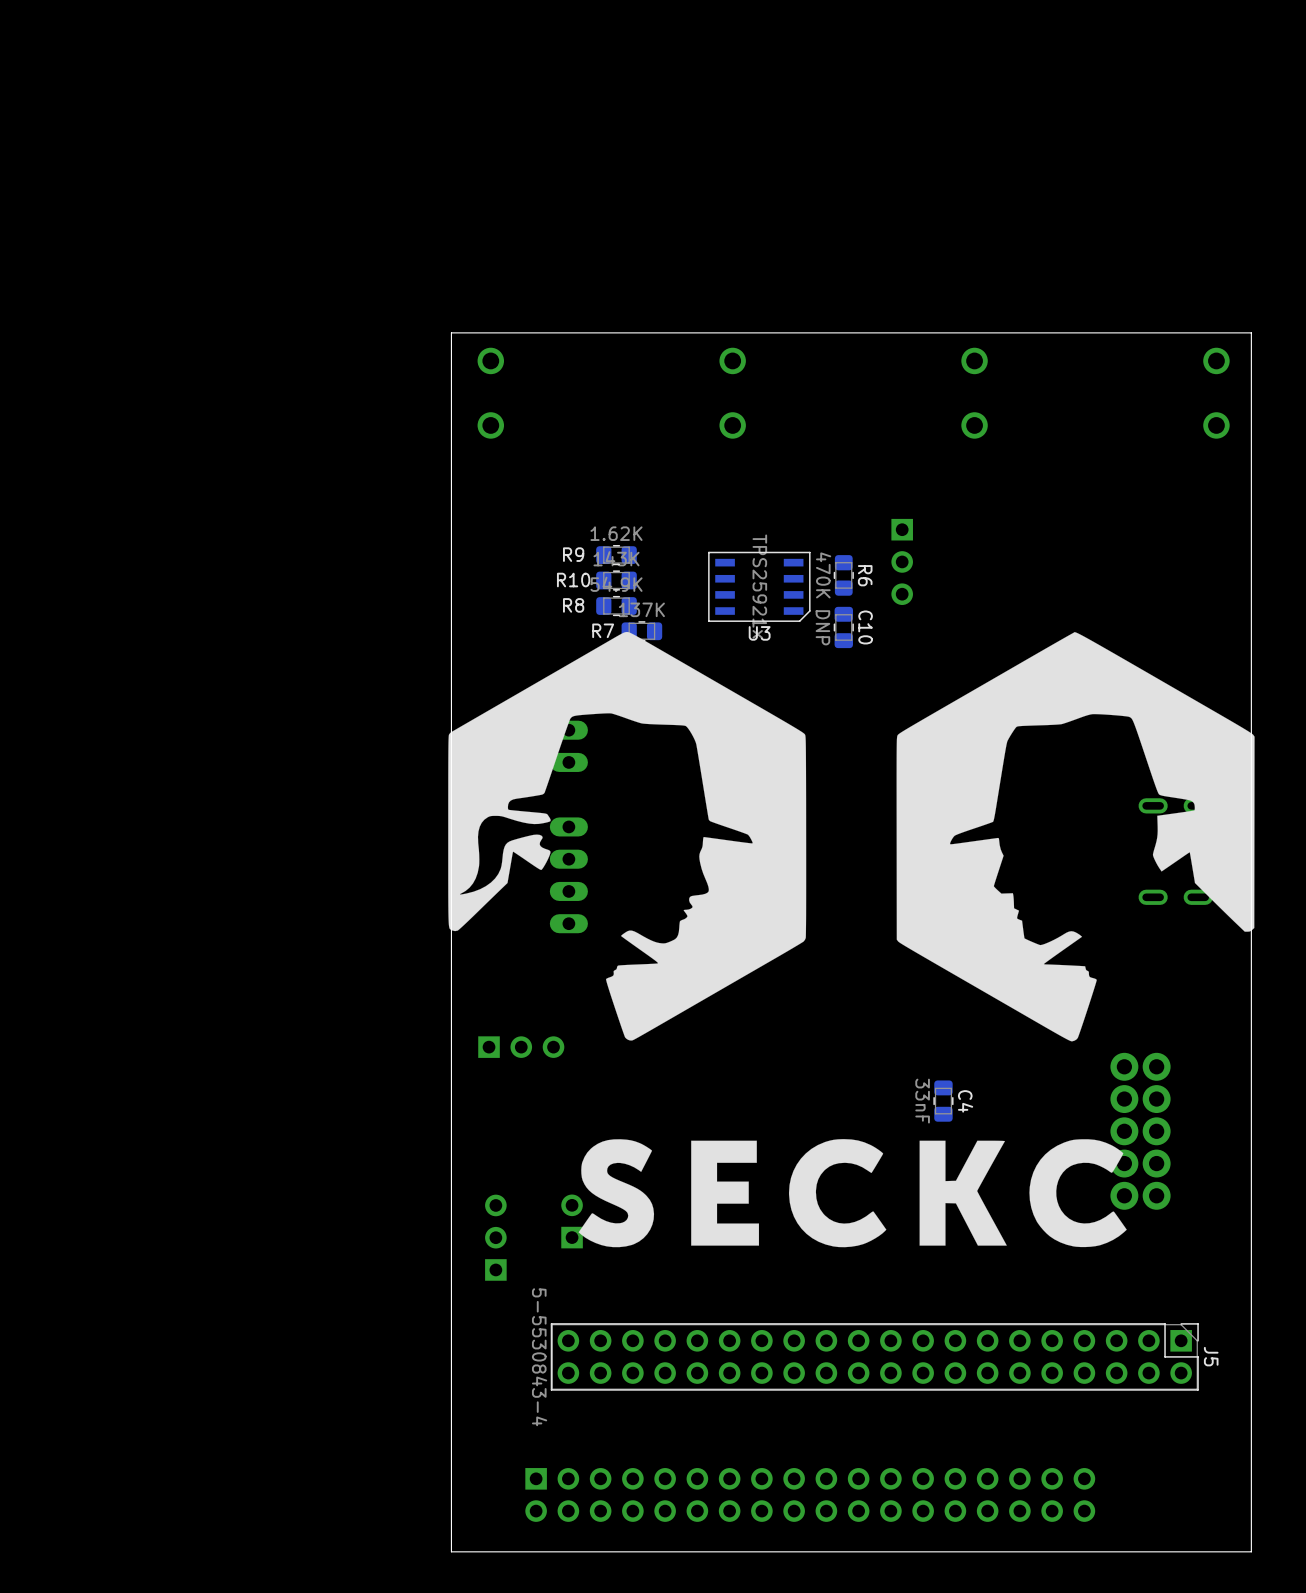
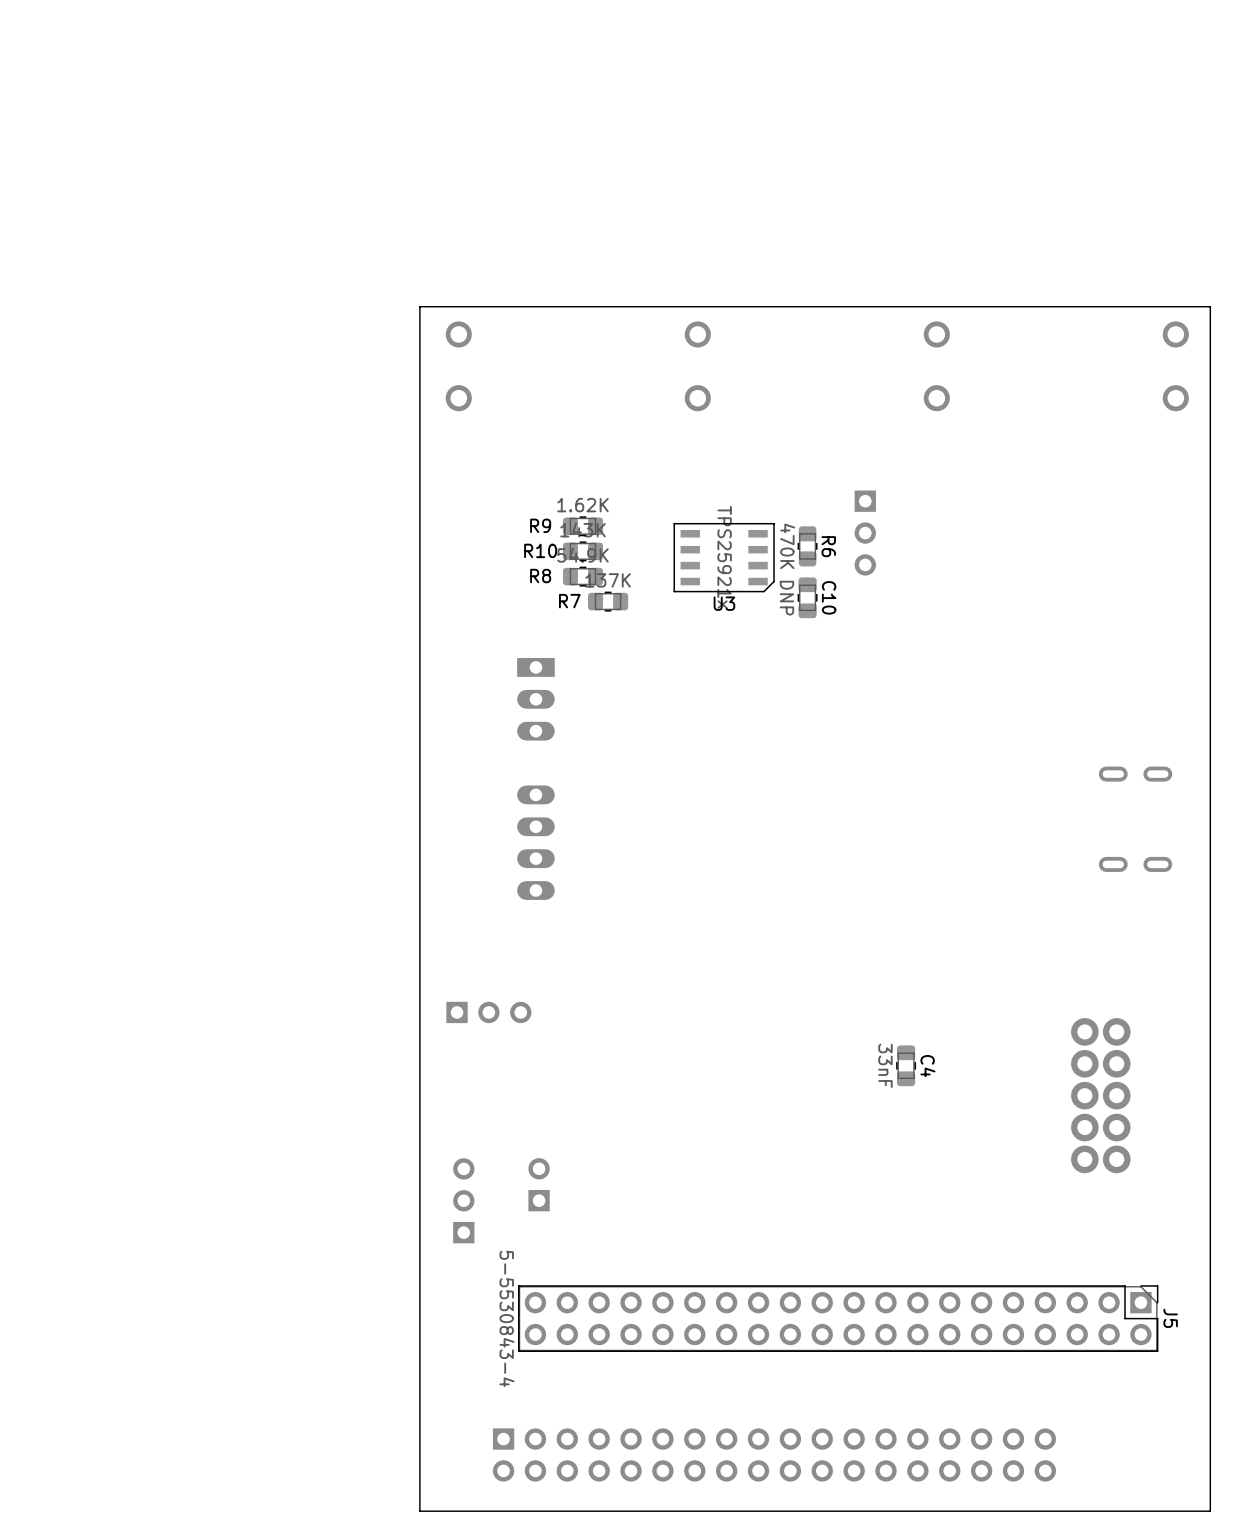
drawing: [448, 631, 1255, 1248] -> none

